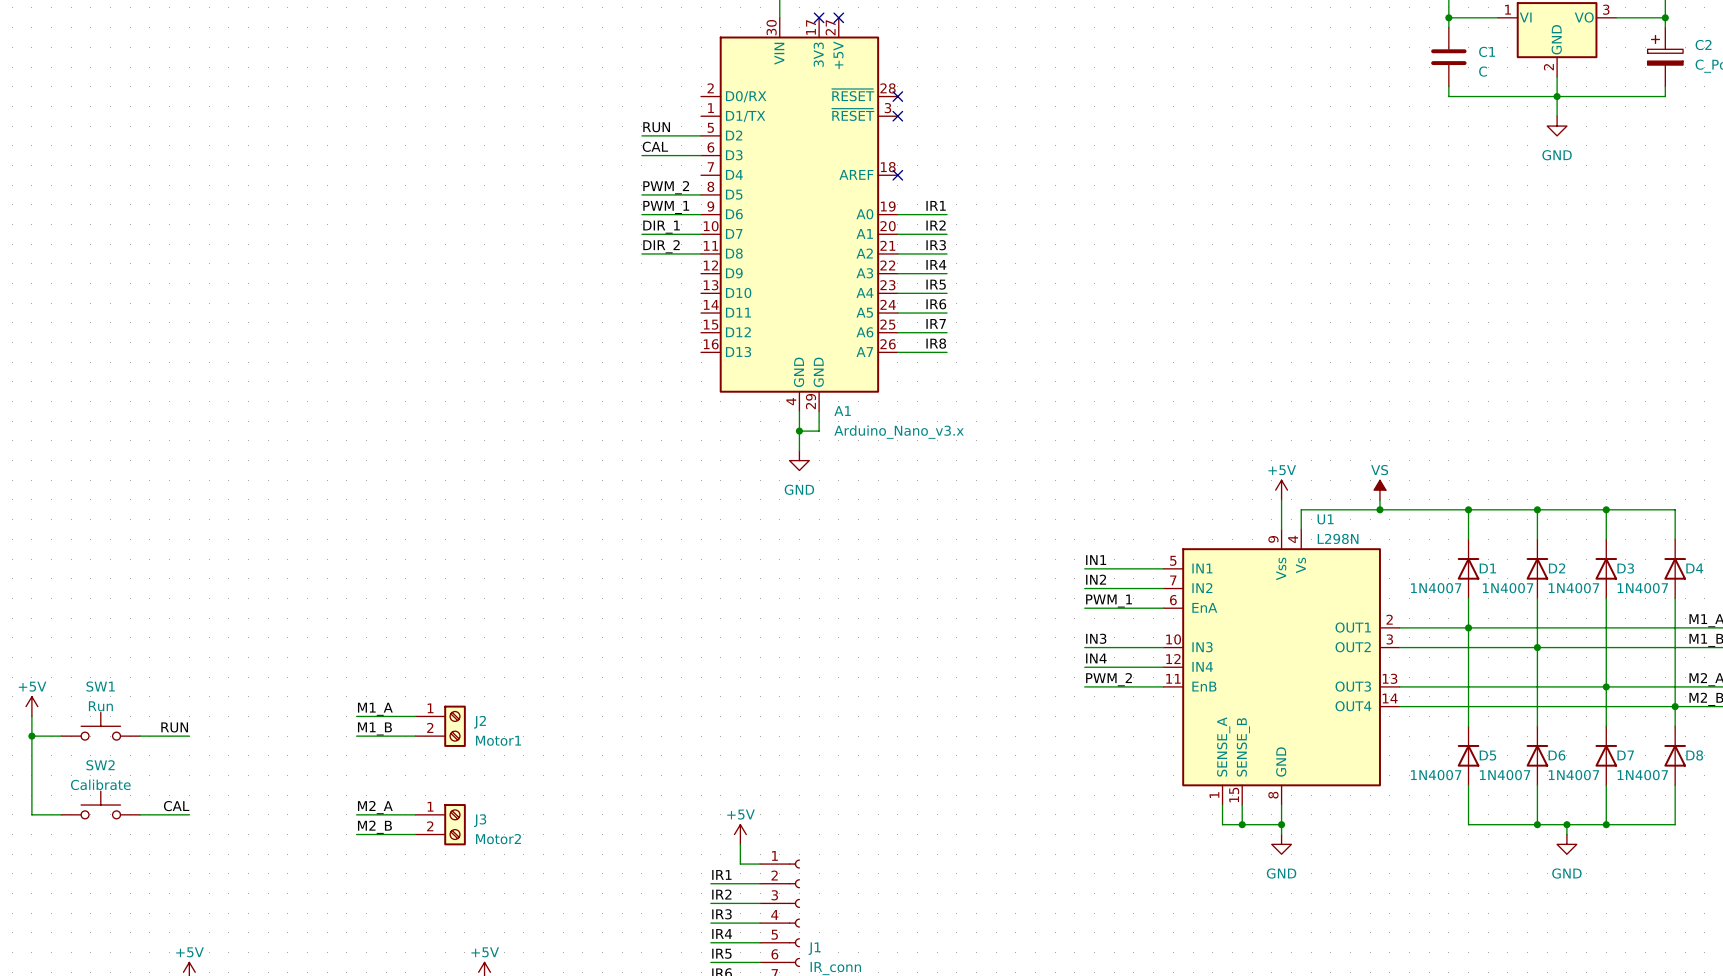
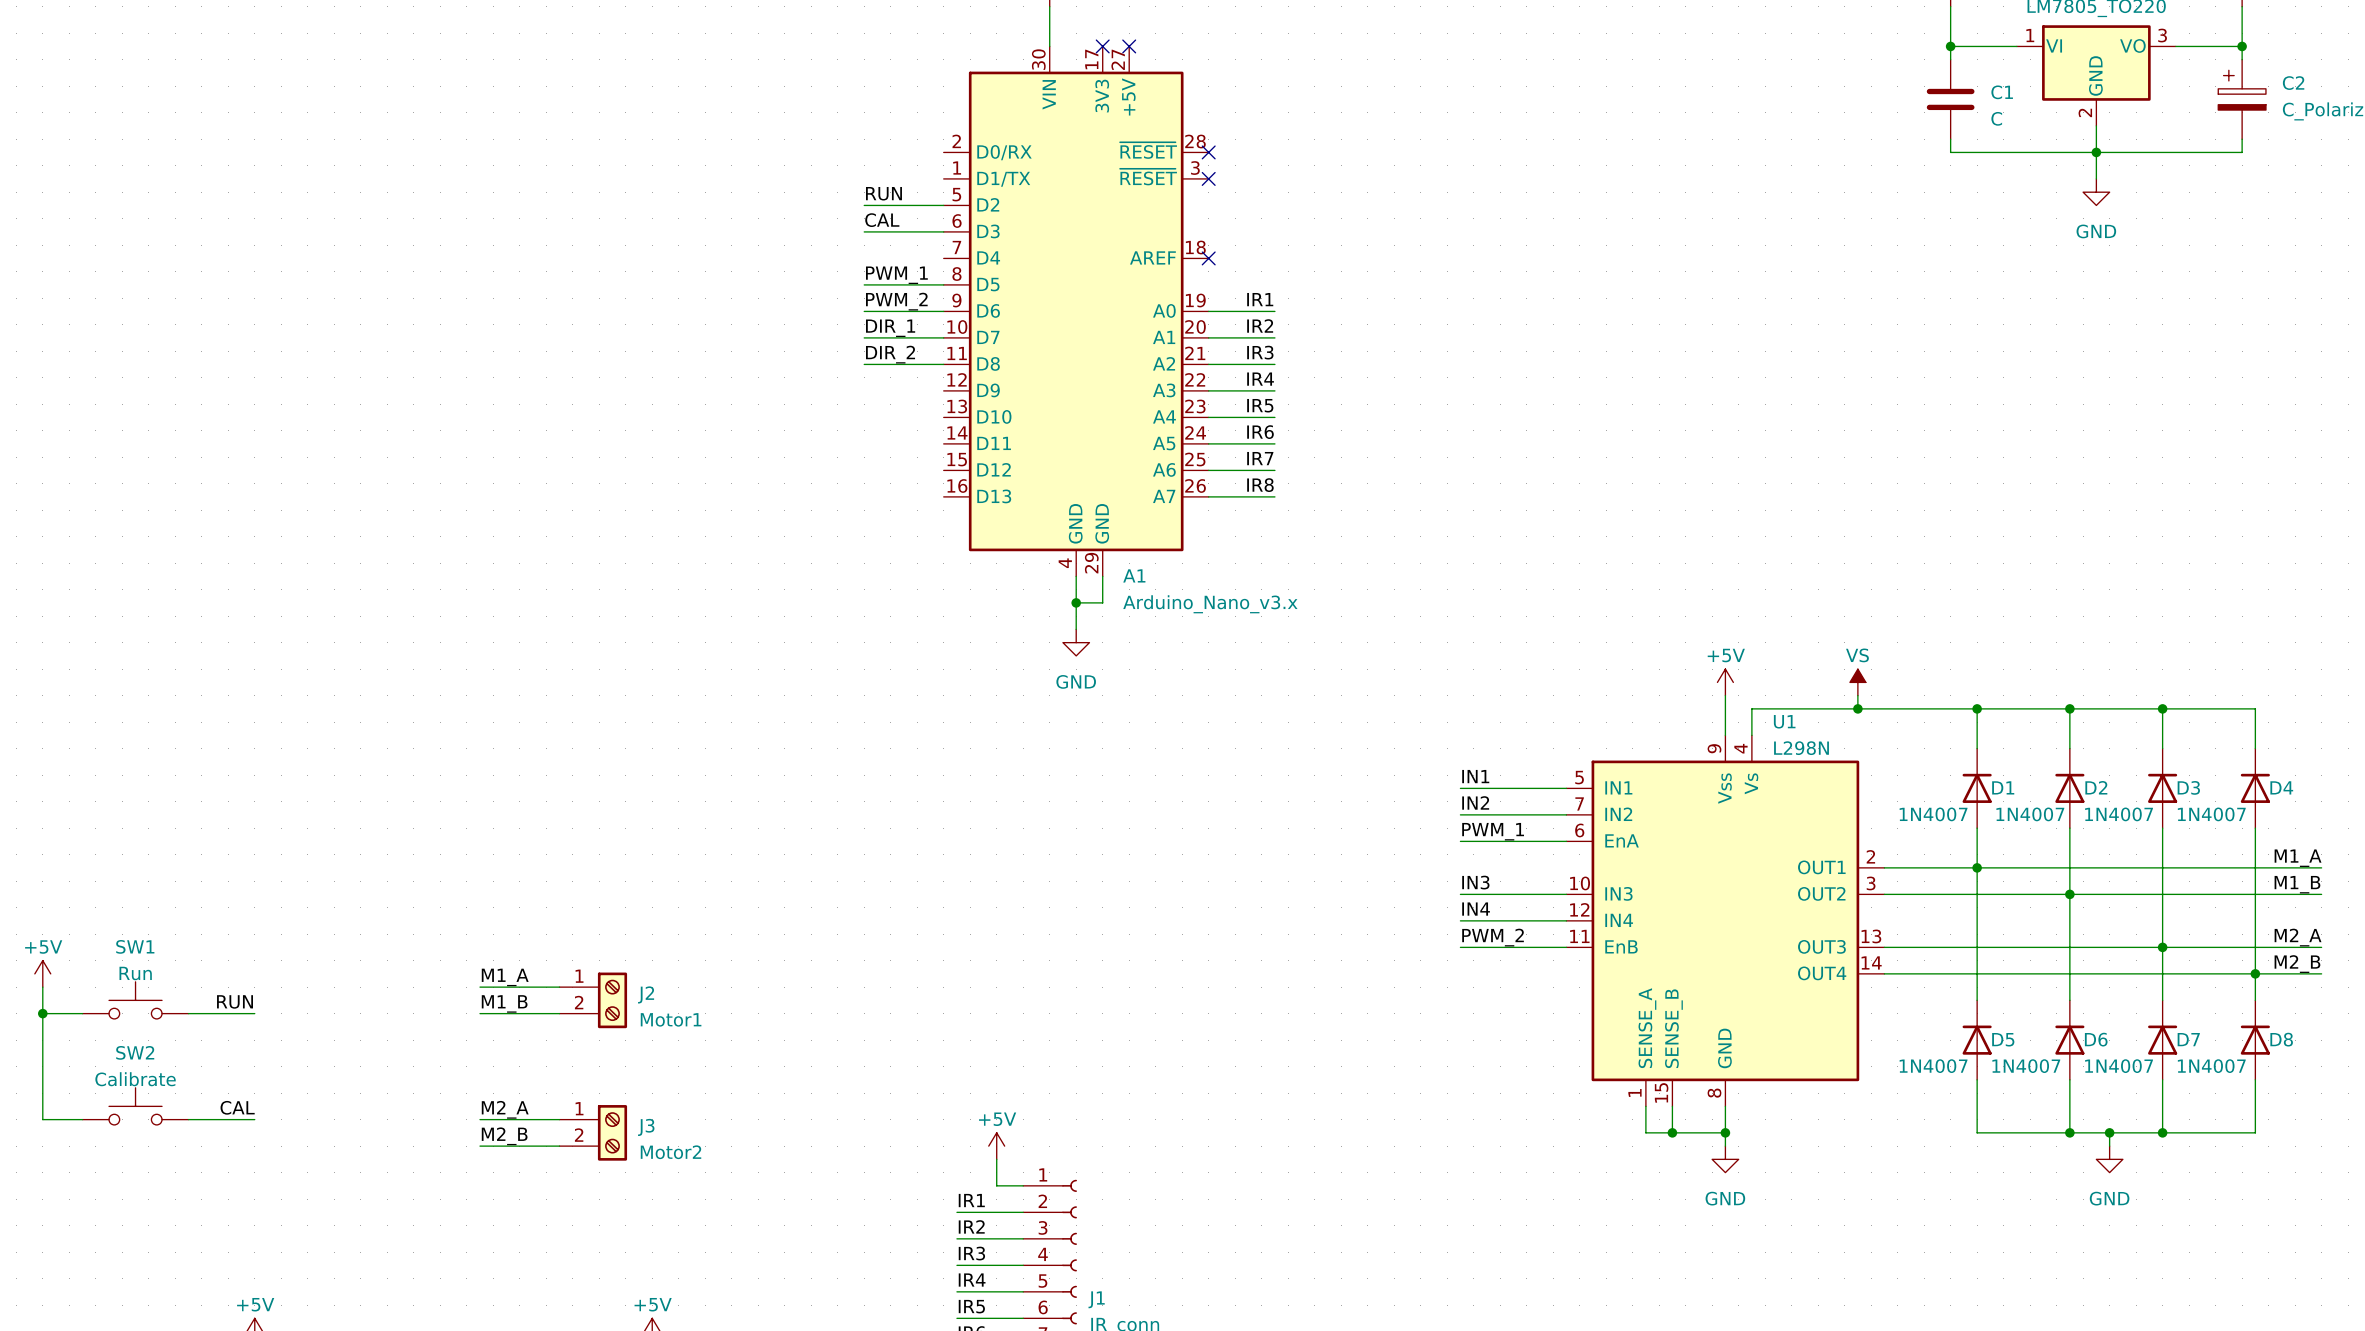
label: PWM_2 (666, 187) -> PWM_1 (896, 275)
label: PWM_1 (666, 207) -> PWM_2 (896, 301)

